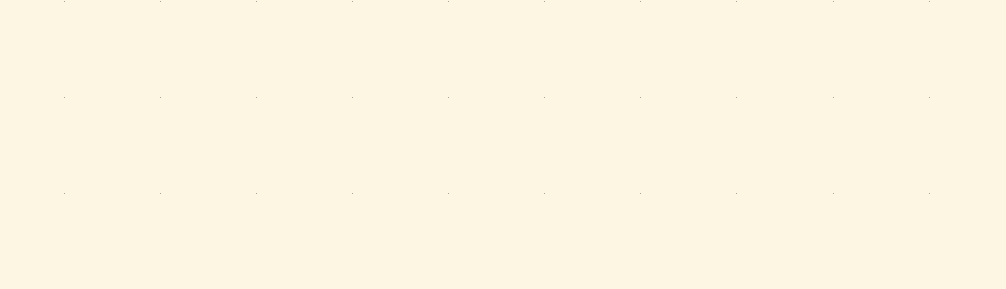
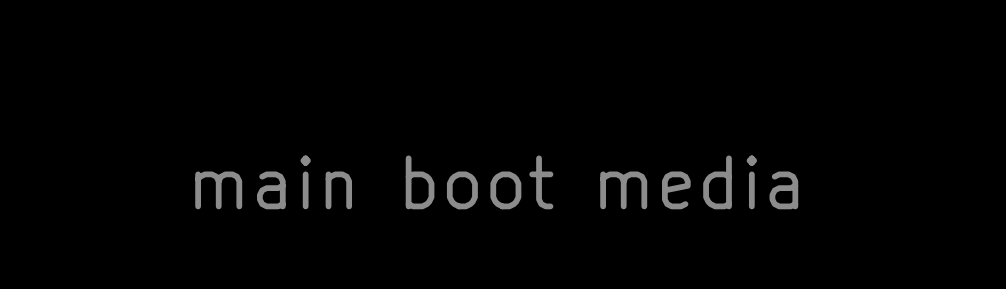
text: none -> main boot media (496, 182)

